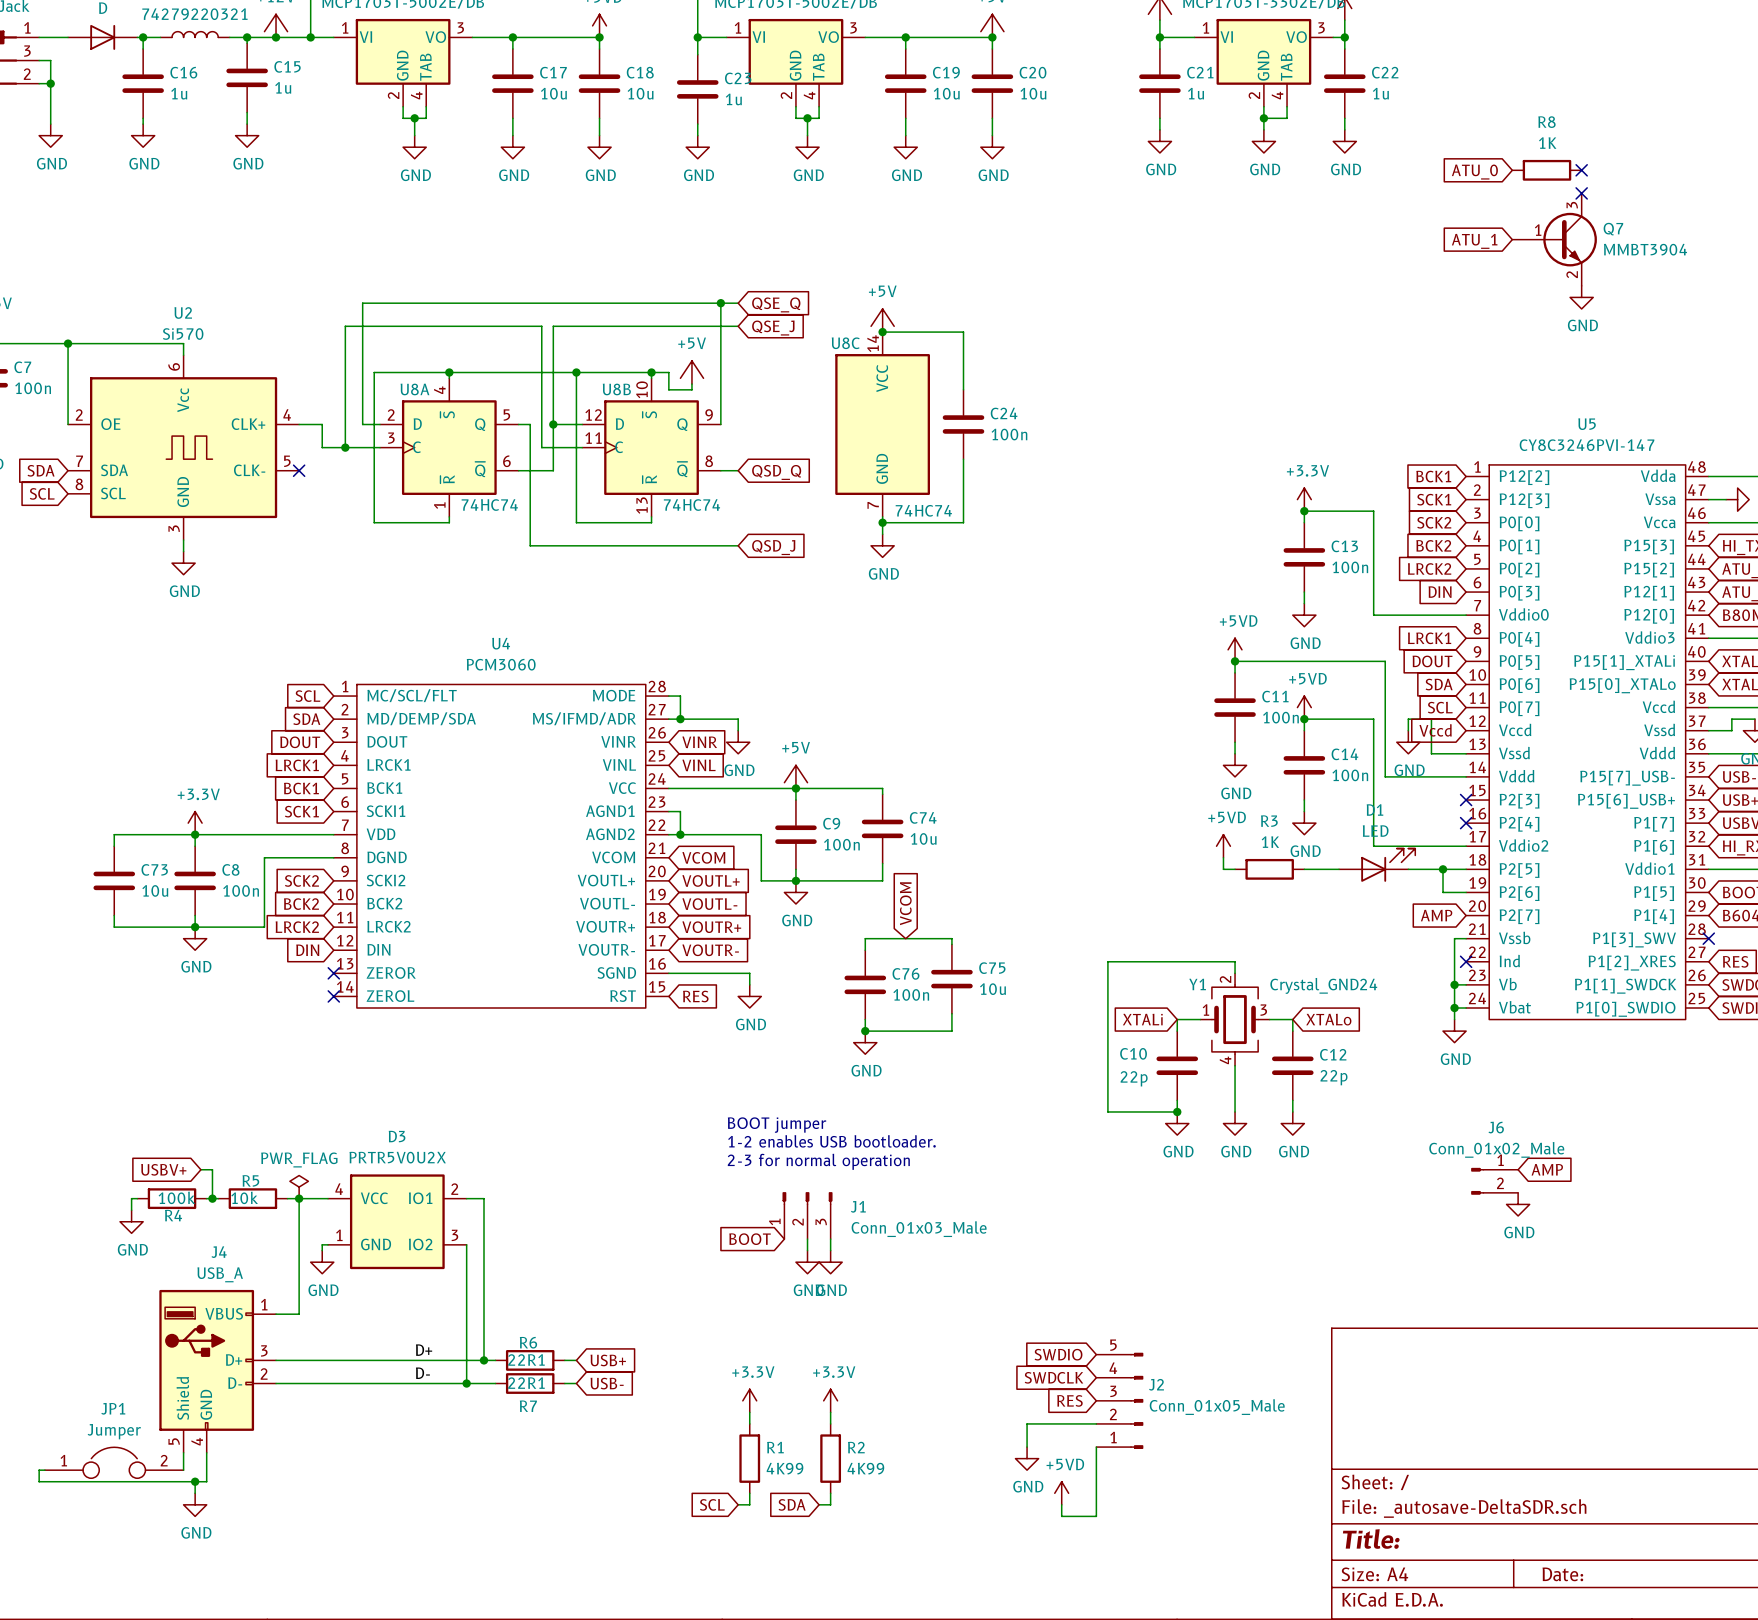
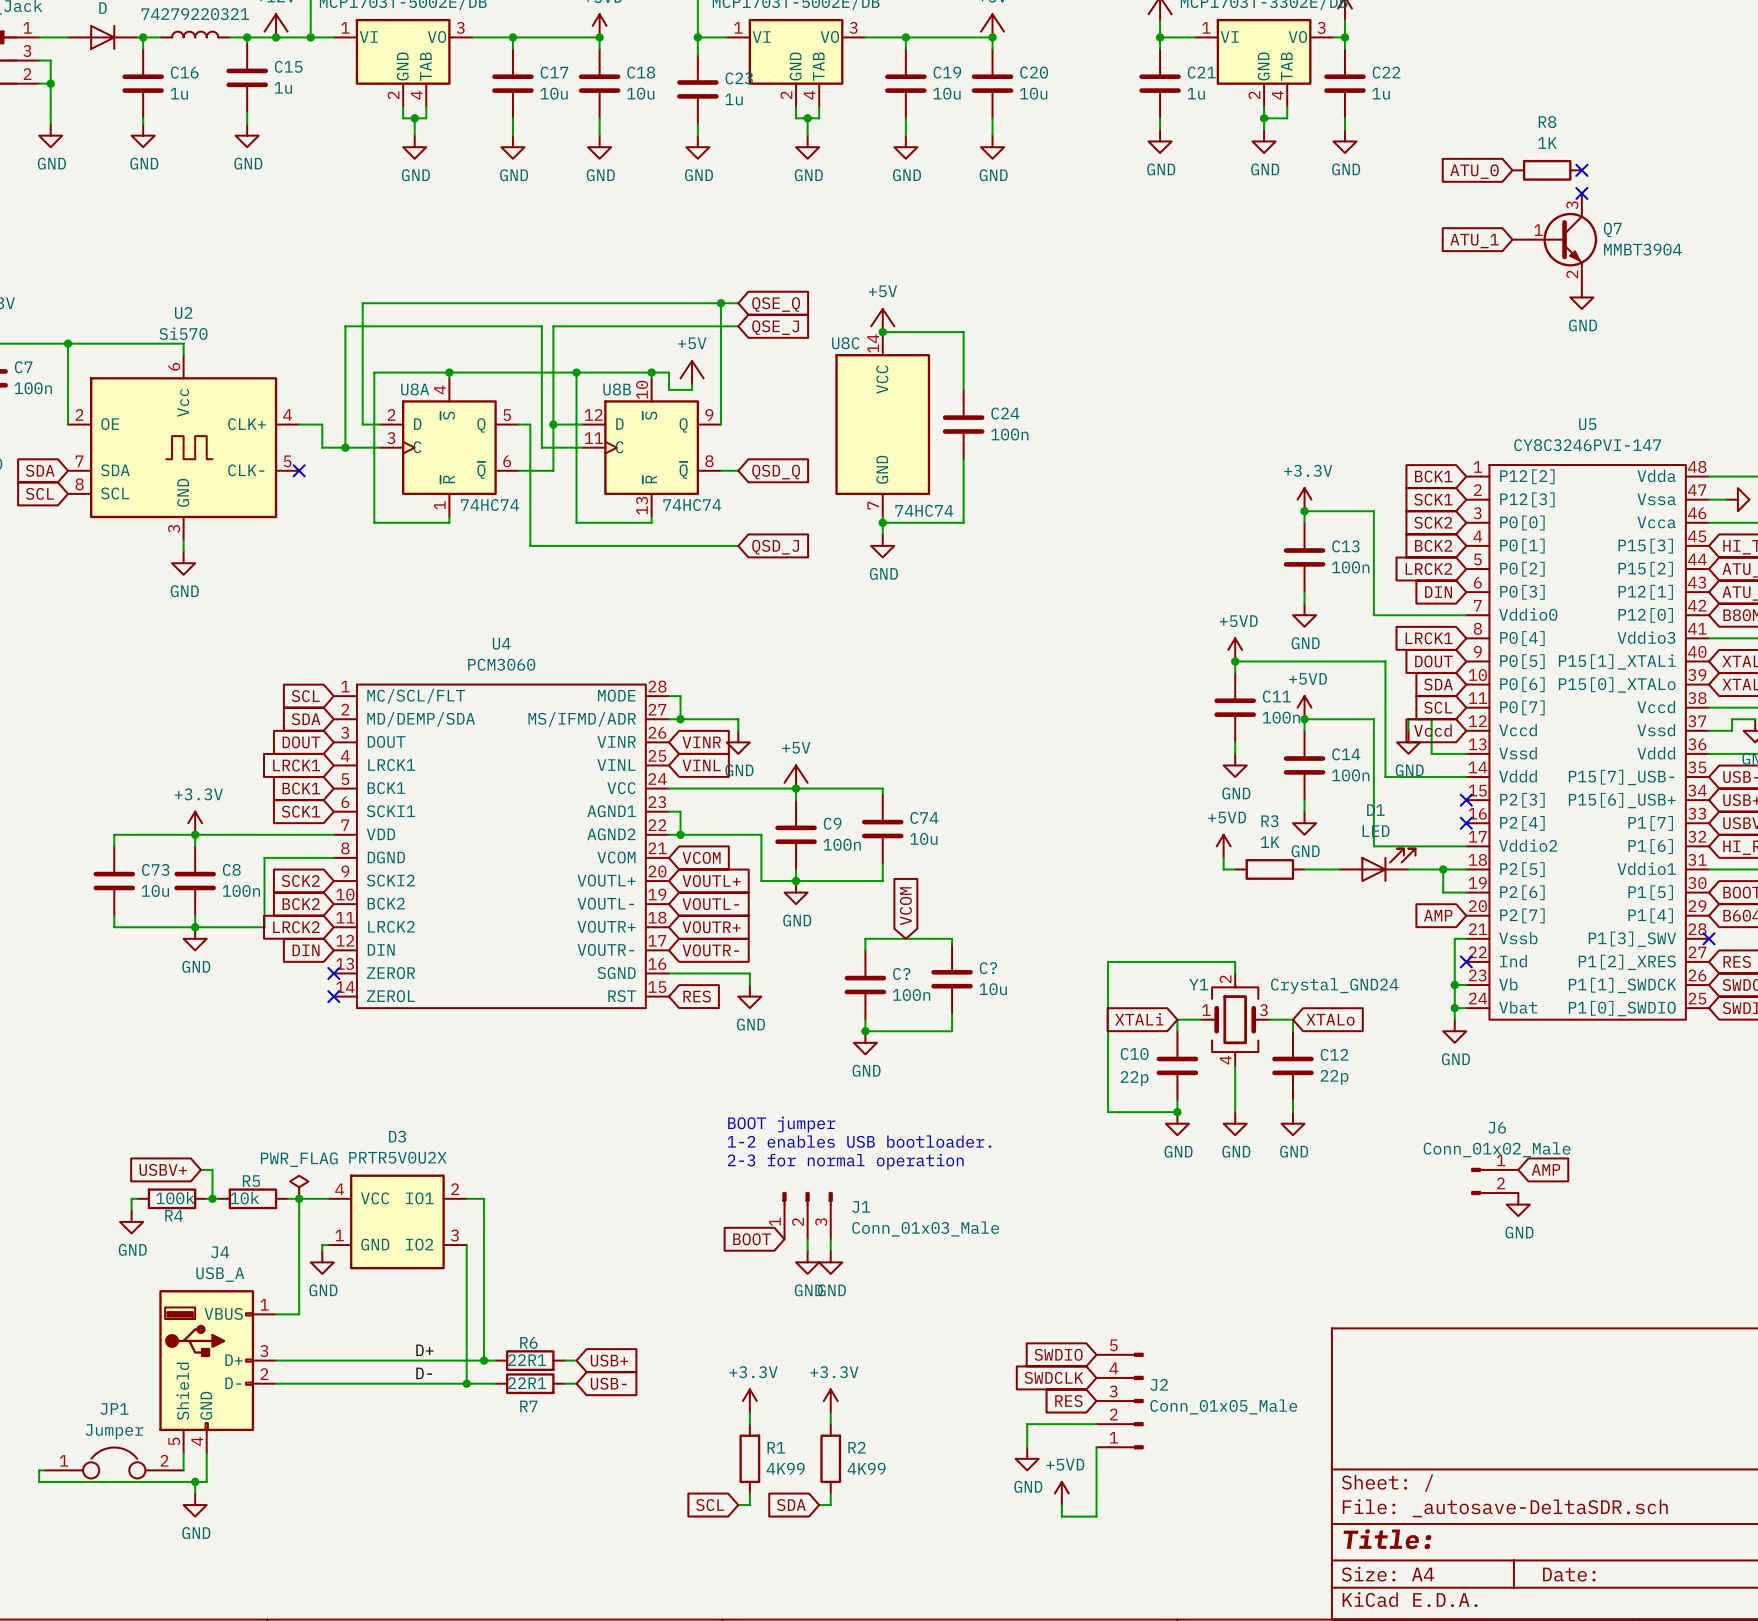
C75 name: C75 (992, 968) -> C? (988, 968)
C76 name: C76 (905, 973) -> C? (901, 973)

